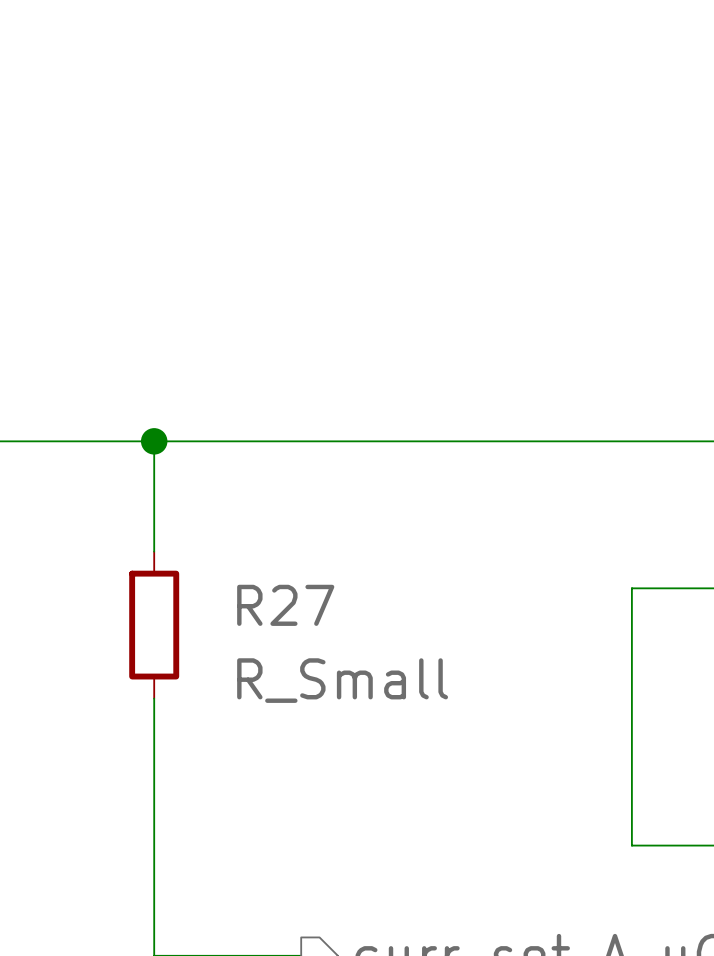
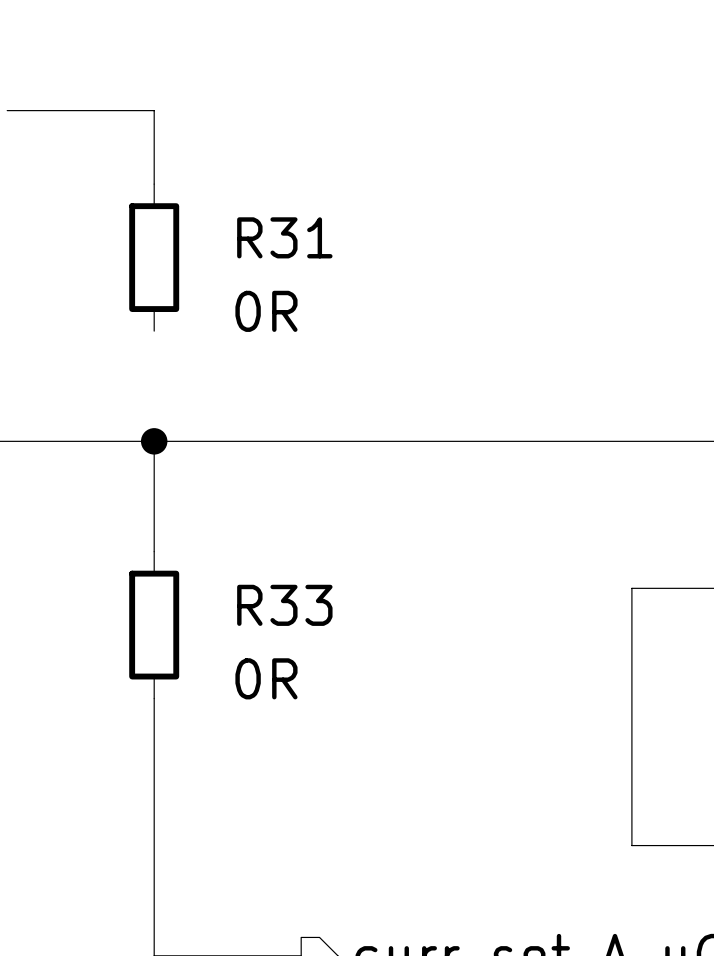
wire: none -> (7, 110) (154, 110) (154, 184)
R31: none -> 0R (154, 257)
R27 name: R27 (285, 605) -> R33 (284, 605)
R27 value: R_Small (342, 680) -> 0R (266, 678)

